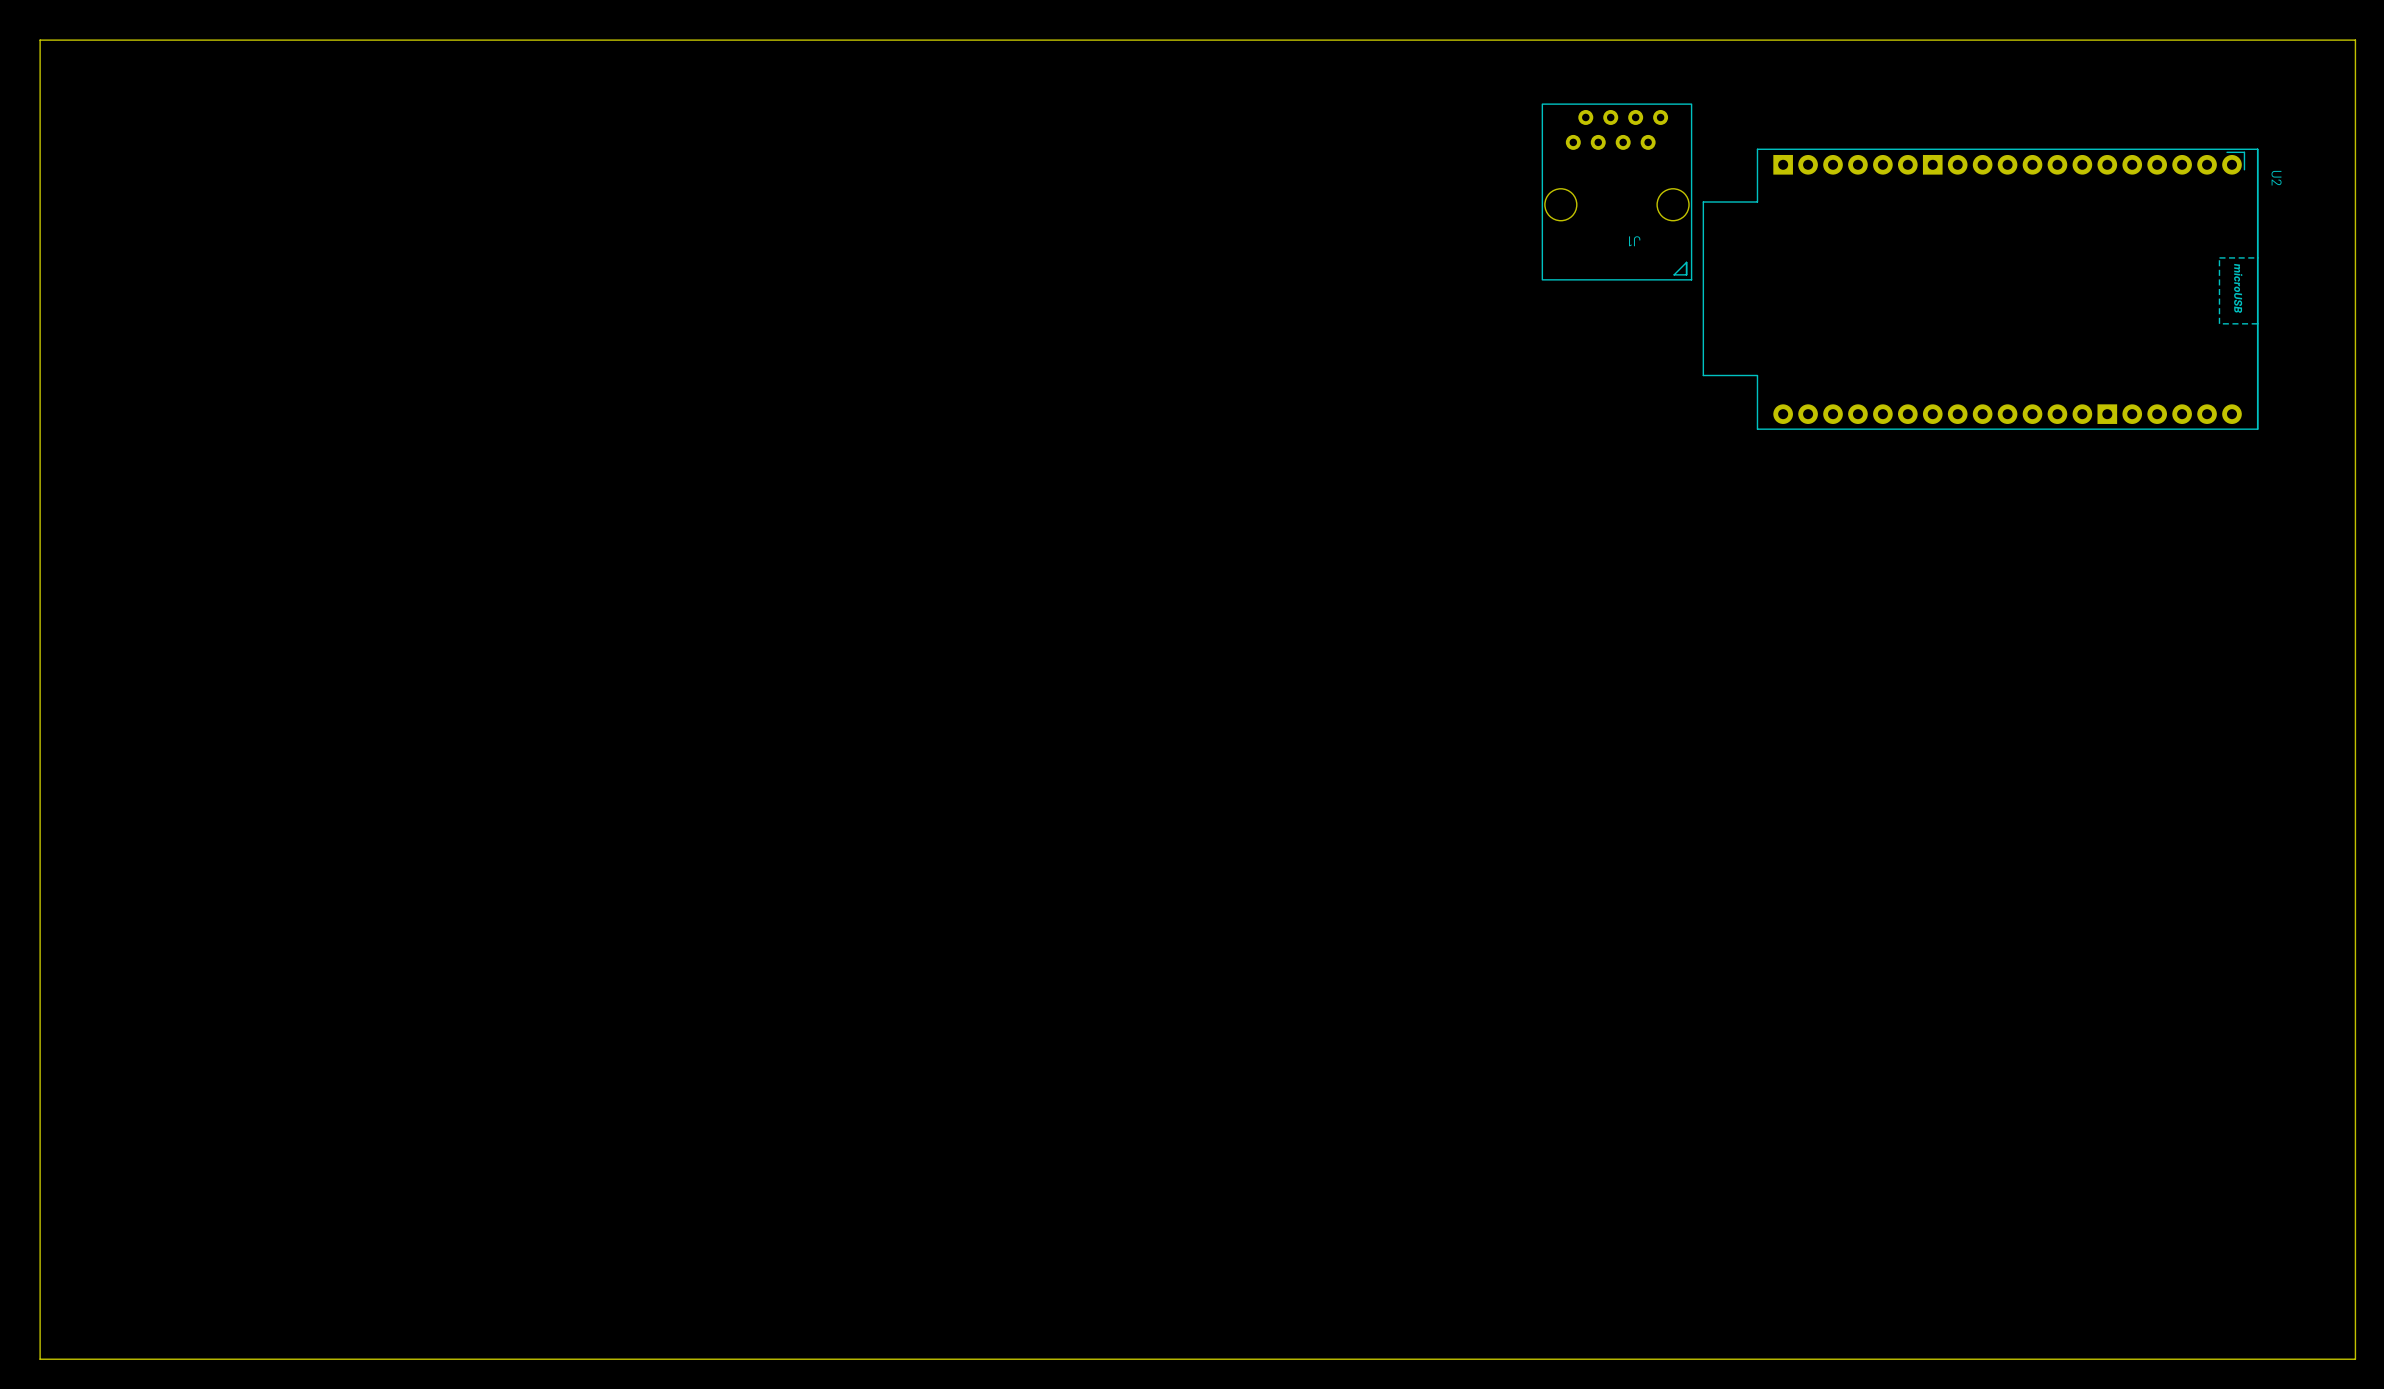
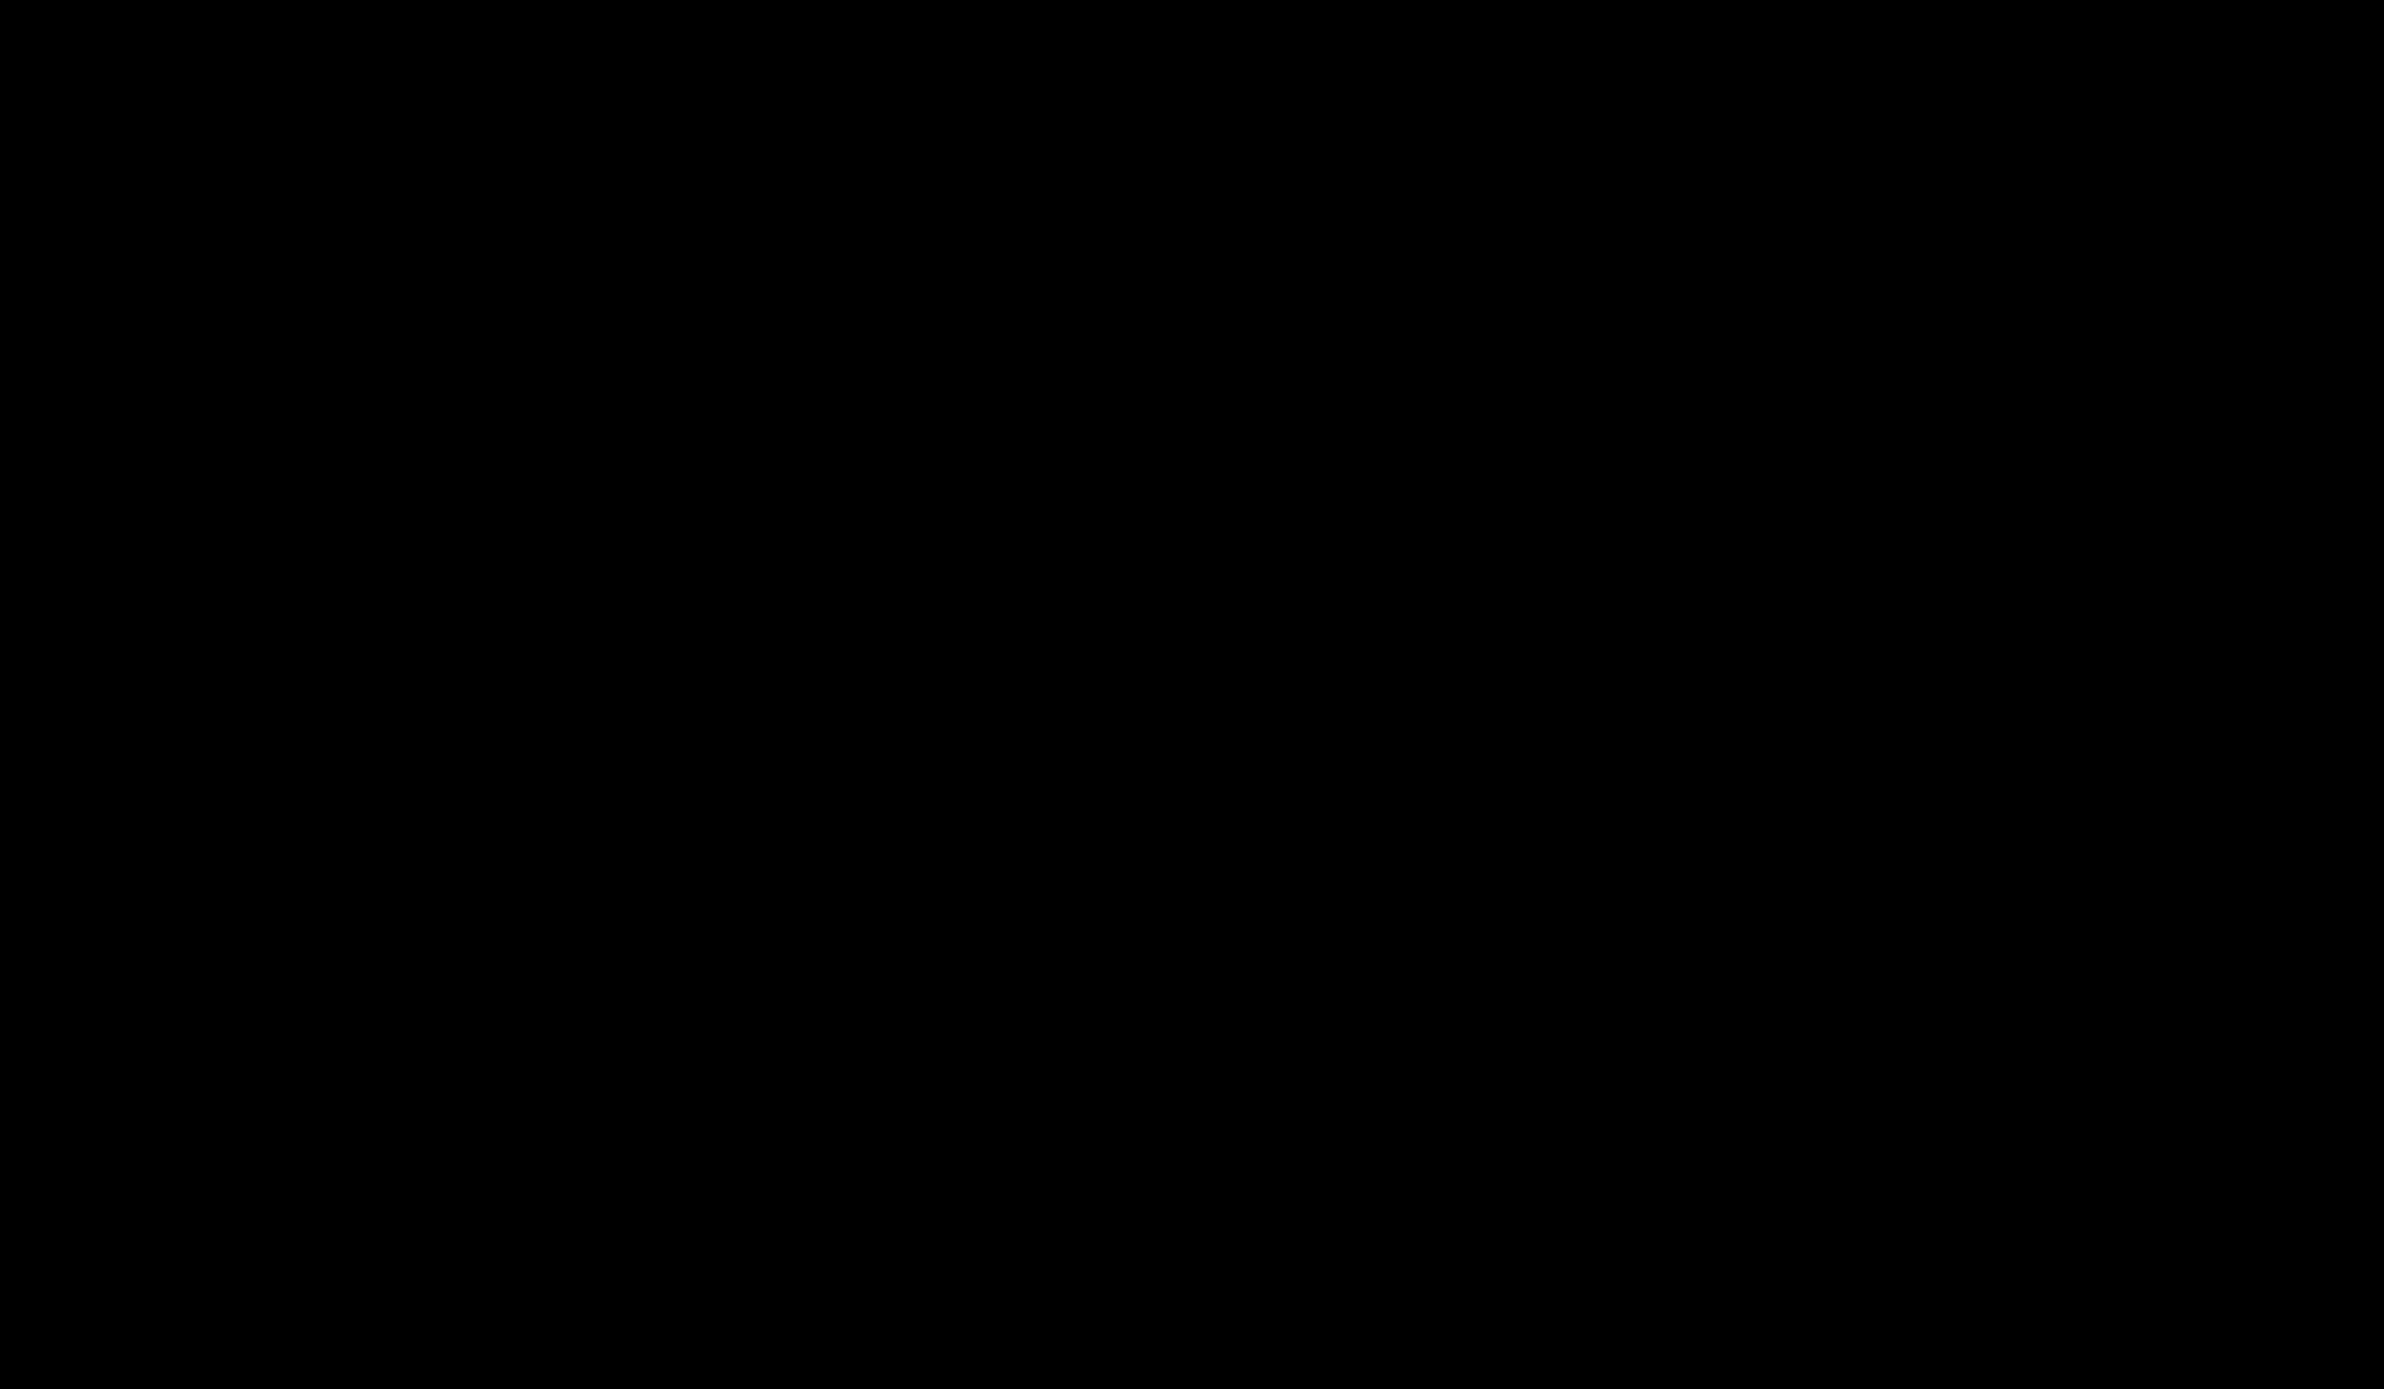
board edge: (2355, 40) (40, 40) (40, 1359) (2355, 1359) (2355, 40) -> none
J1: (1616, 191) -> none
U2: (1980, 289) -> none

